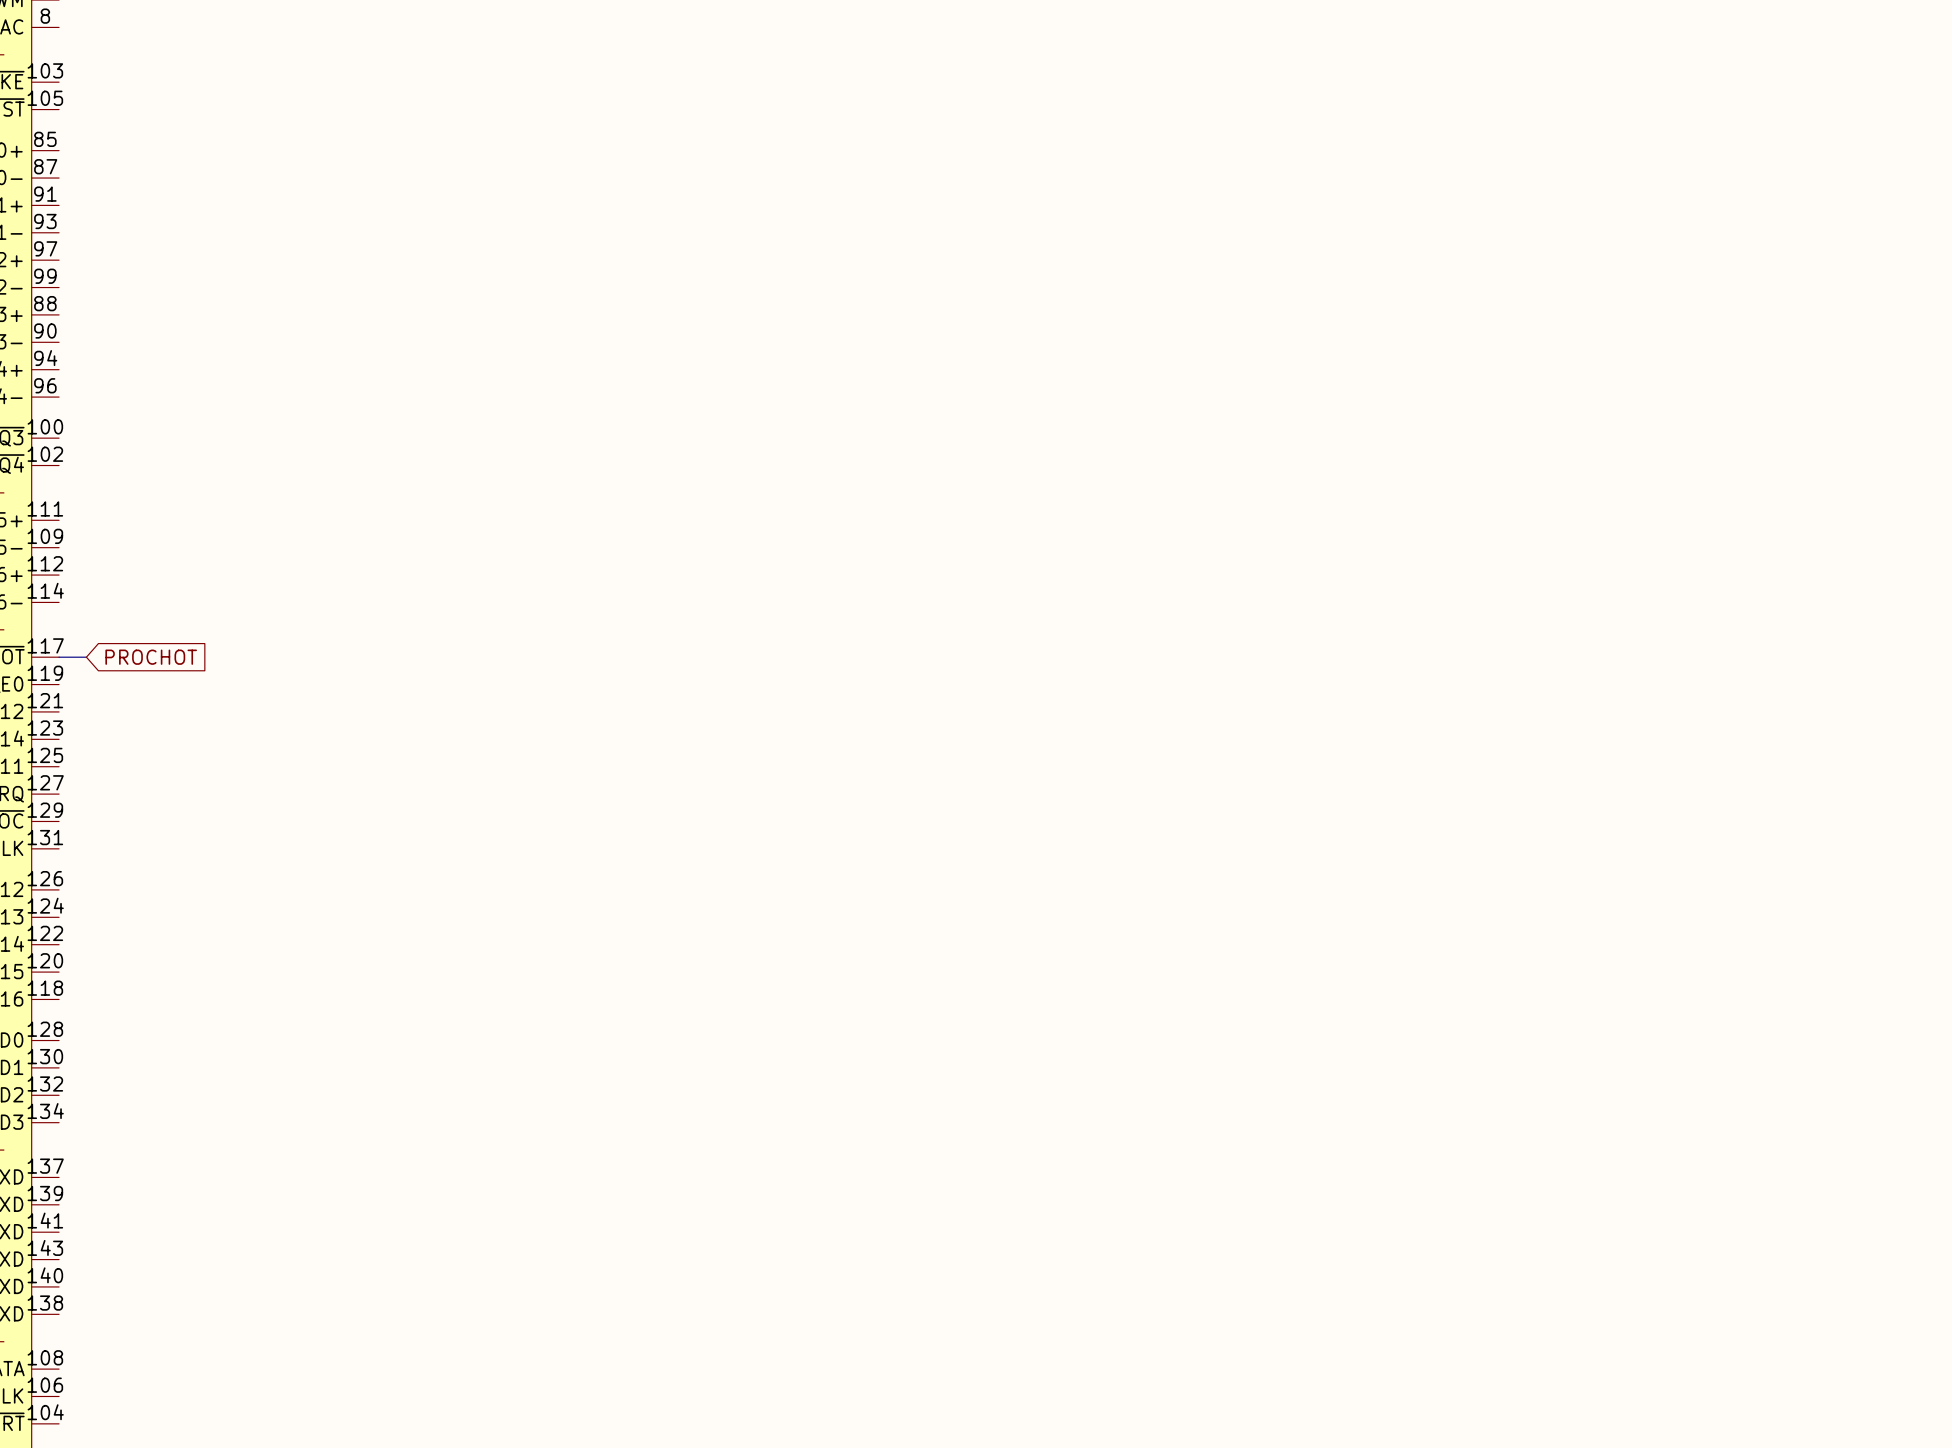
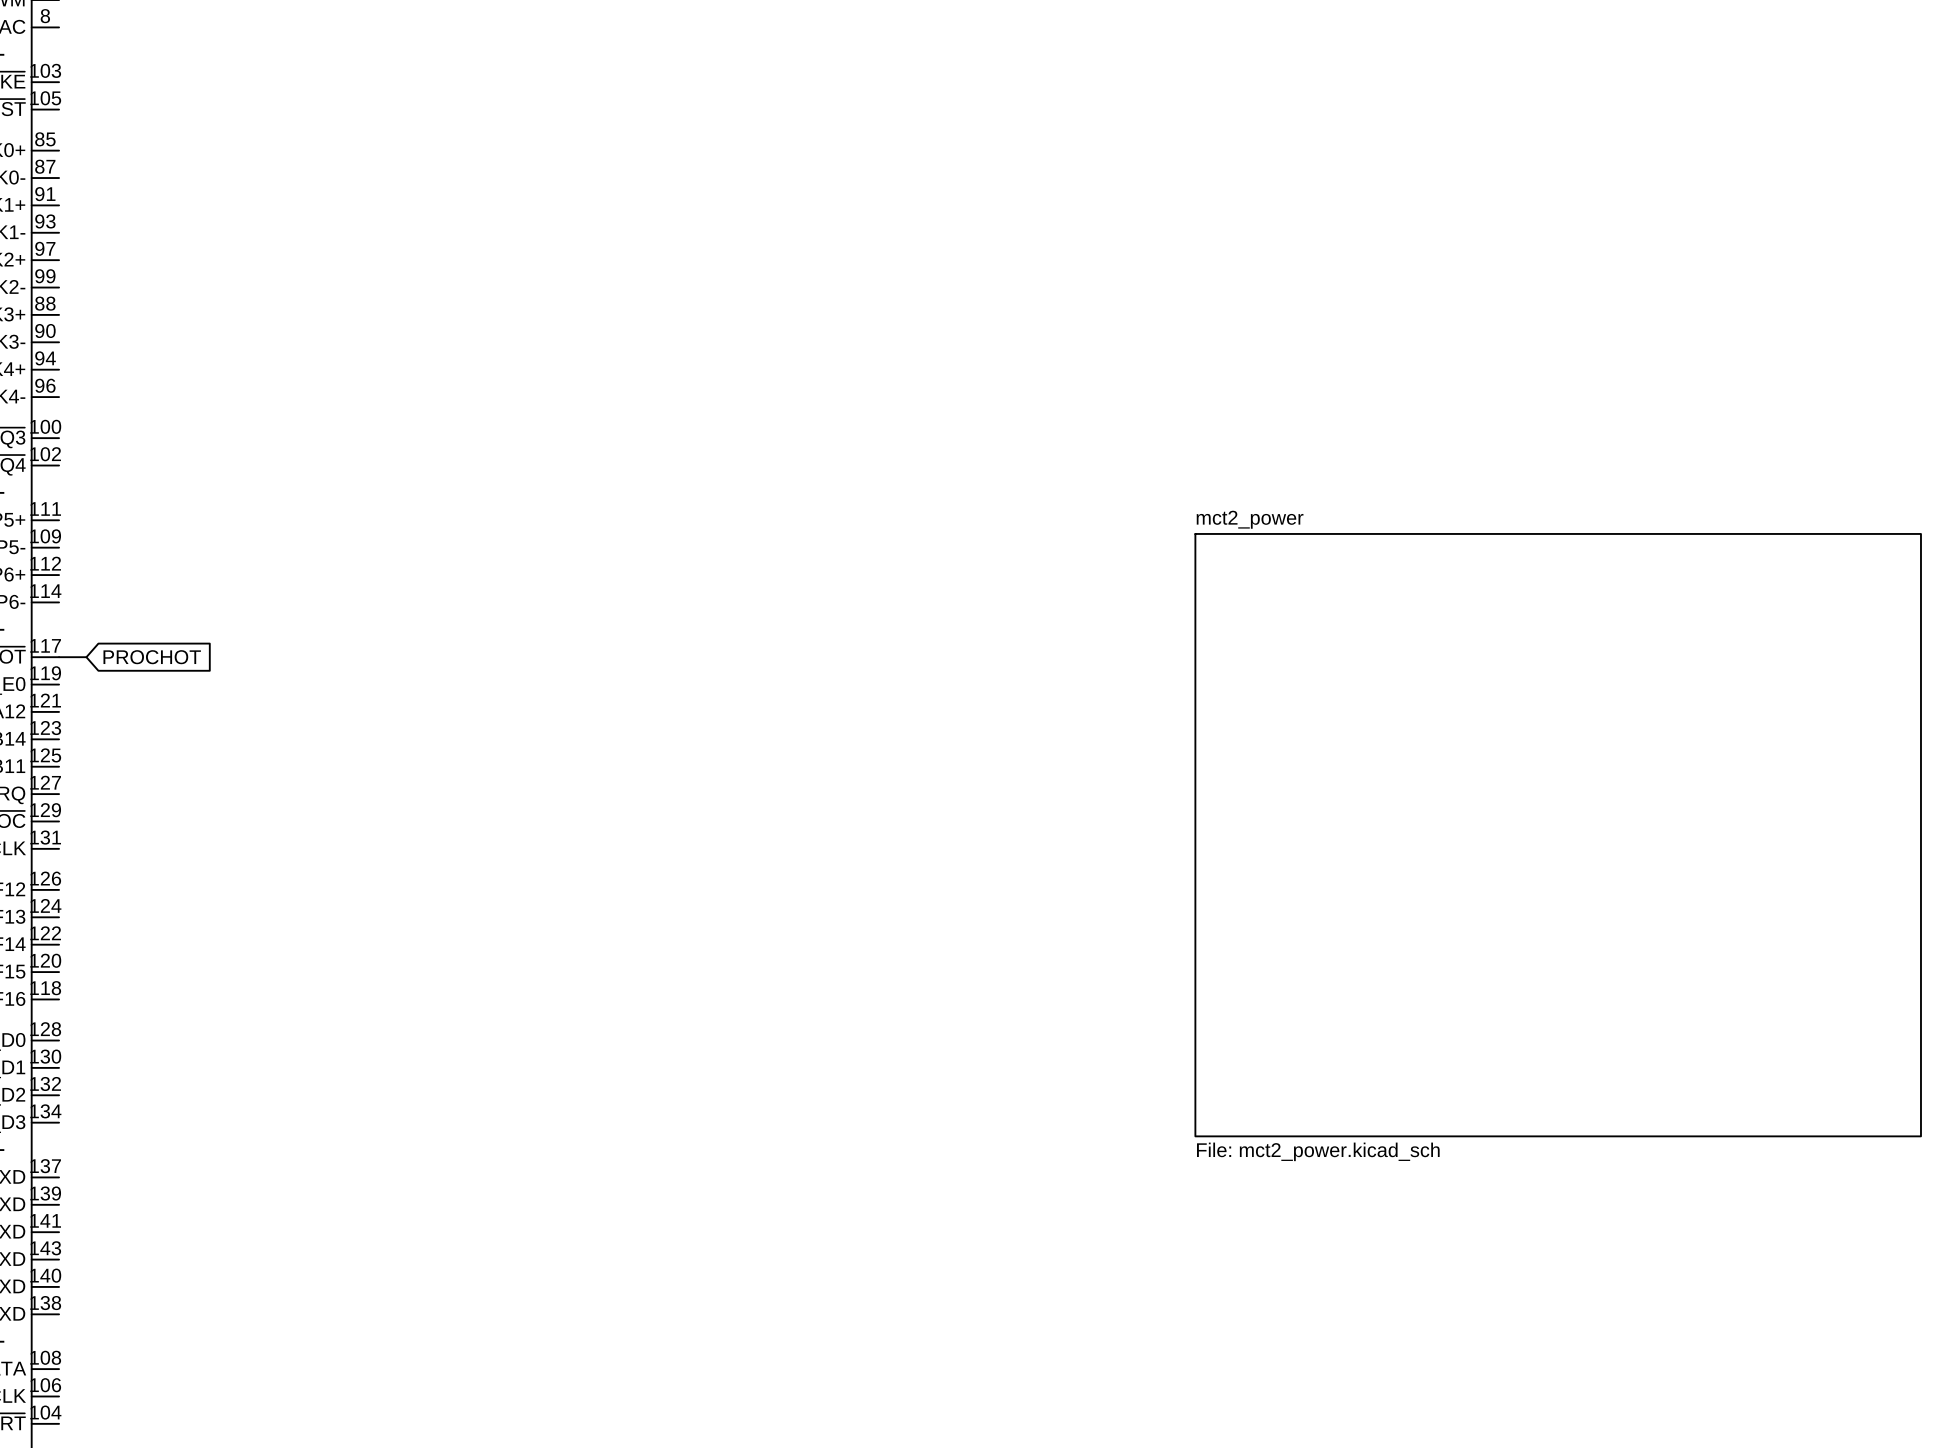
sheet mct2_power: none -> File: mct2_power.kicad_sch (1558, 835)

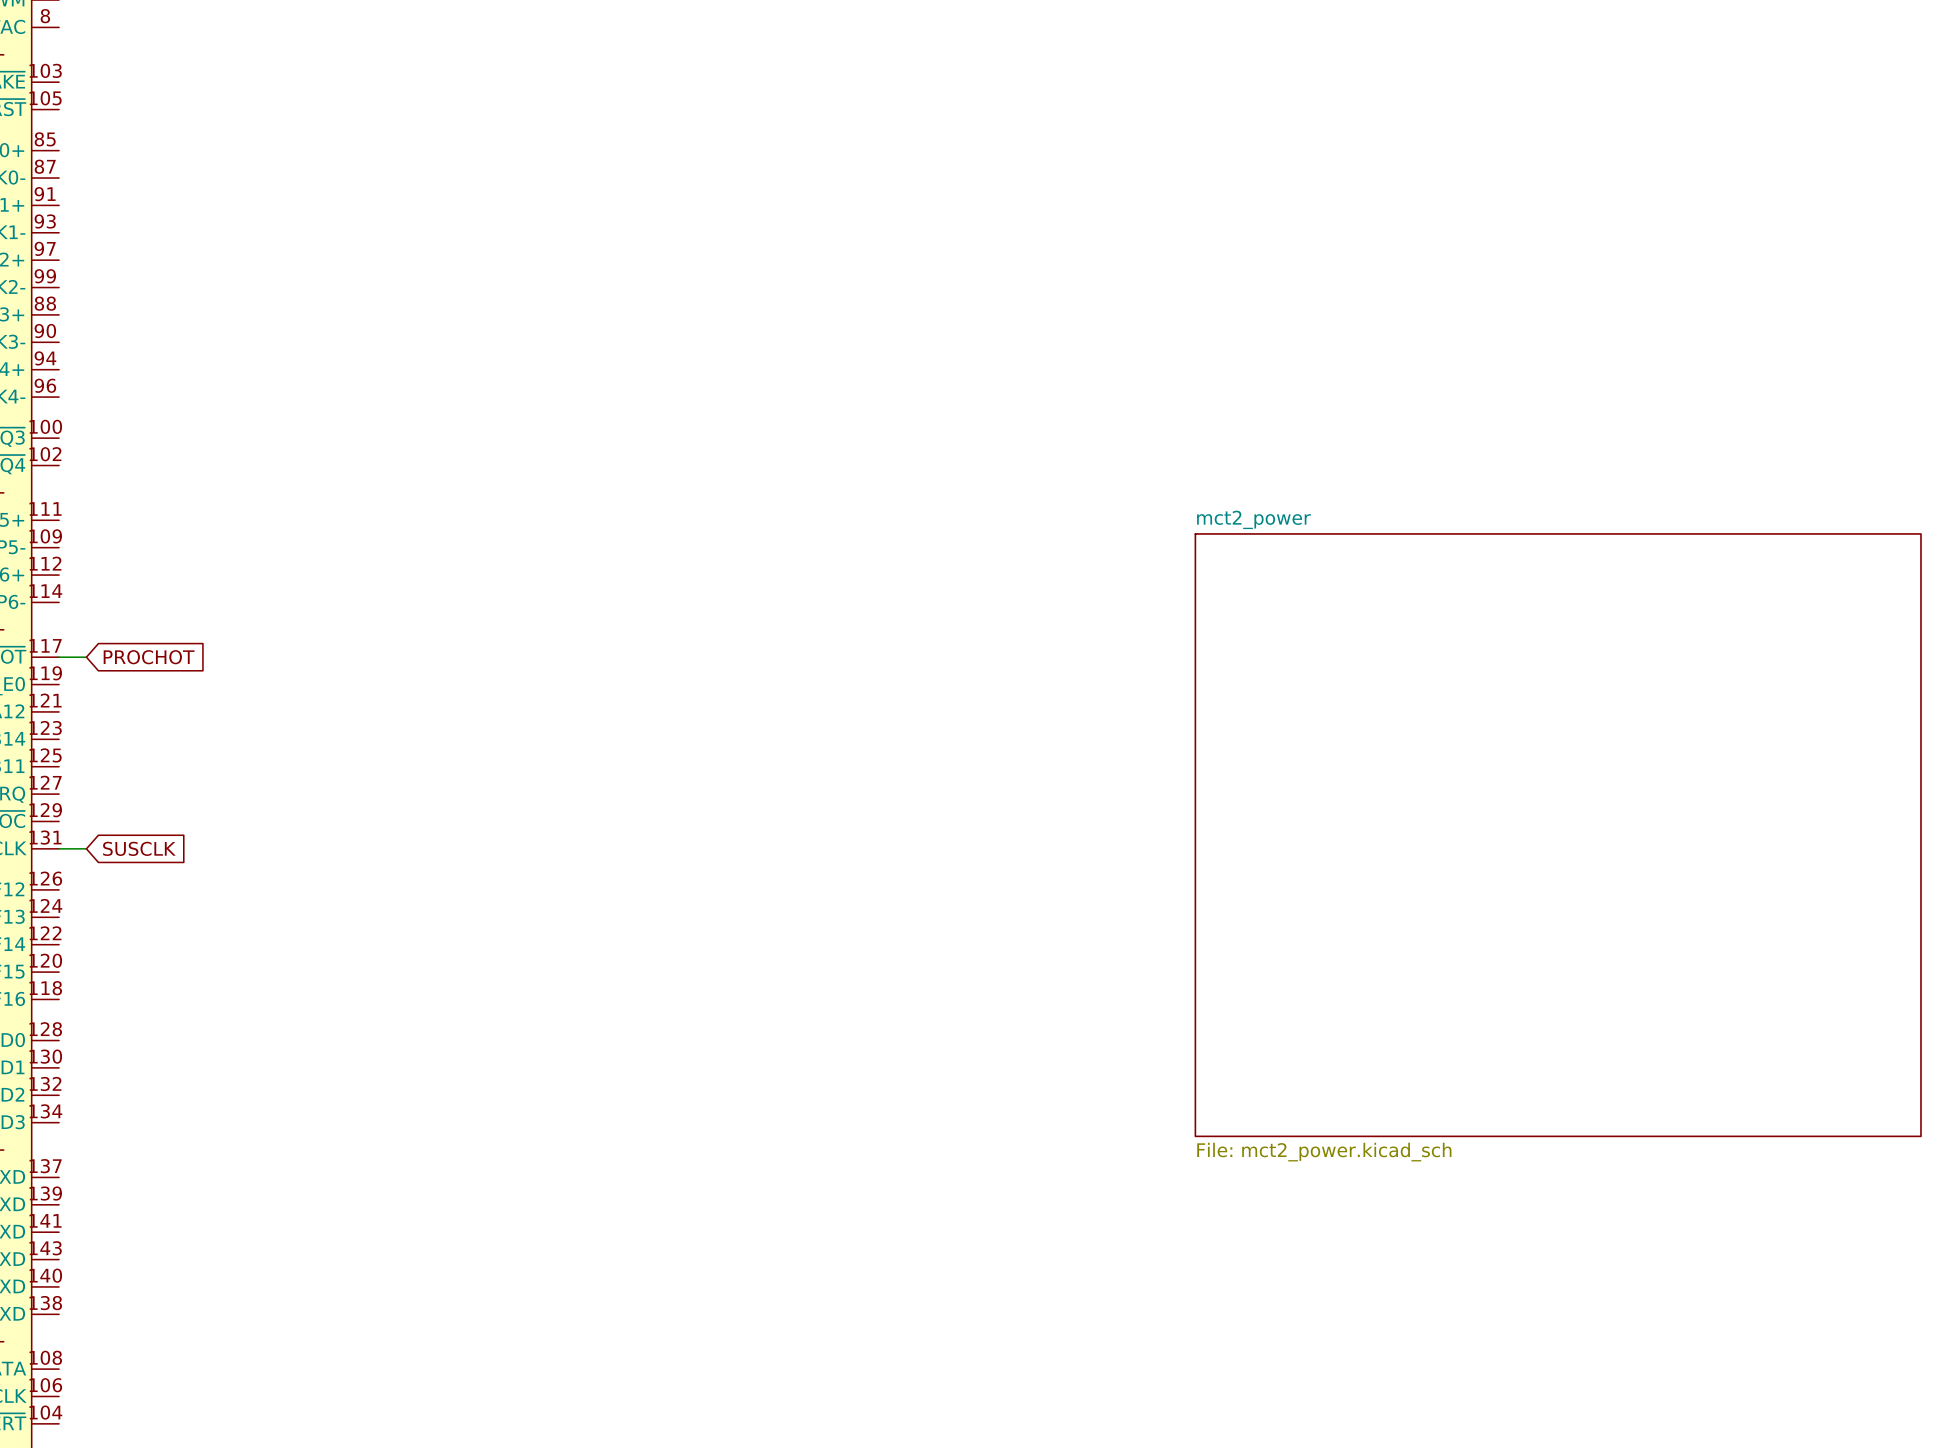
wire: none -> (59, 848) (86, 848)
global label: none -> SUSCLK (139, 848)

